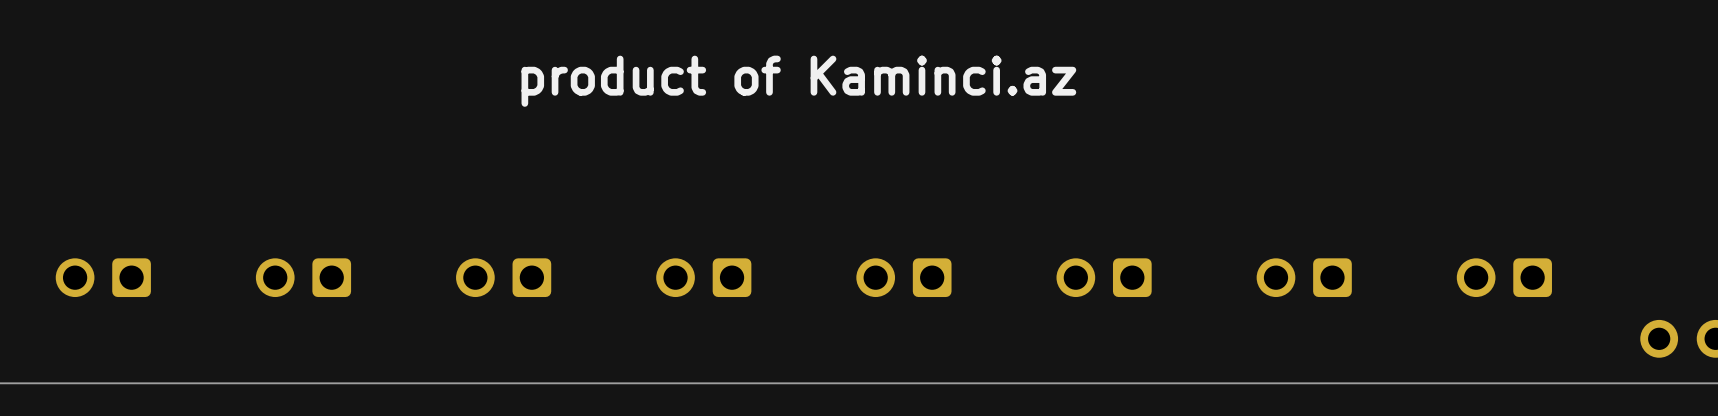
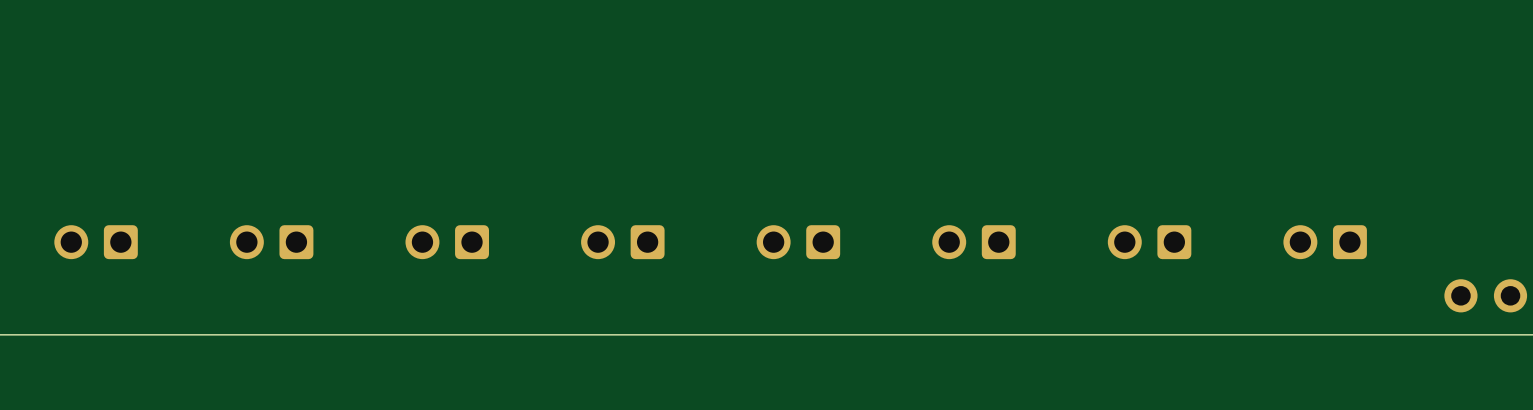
text: product of Kaminci.az (798, 81) -> none

